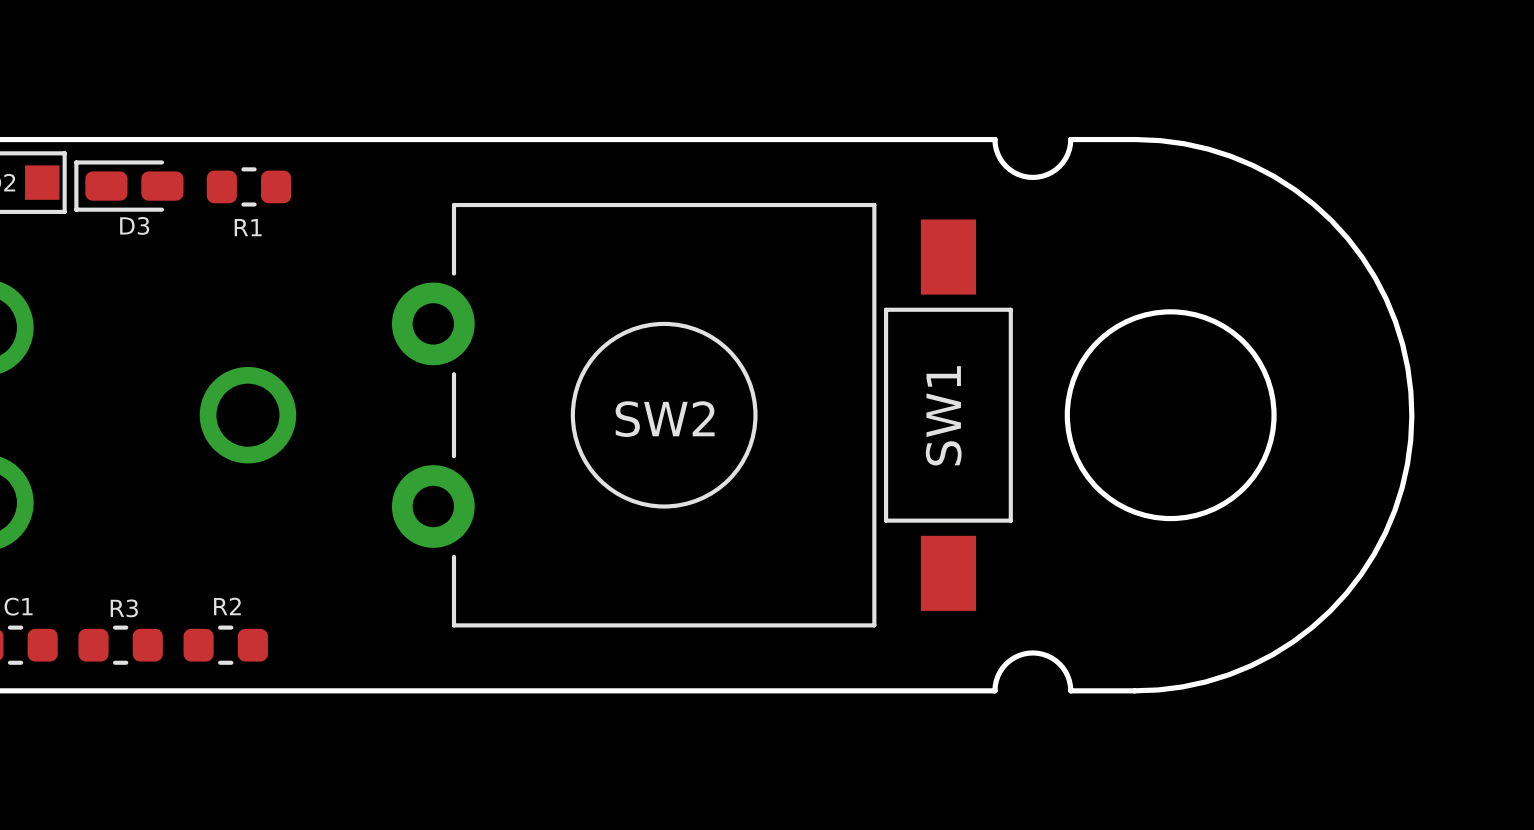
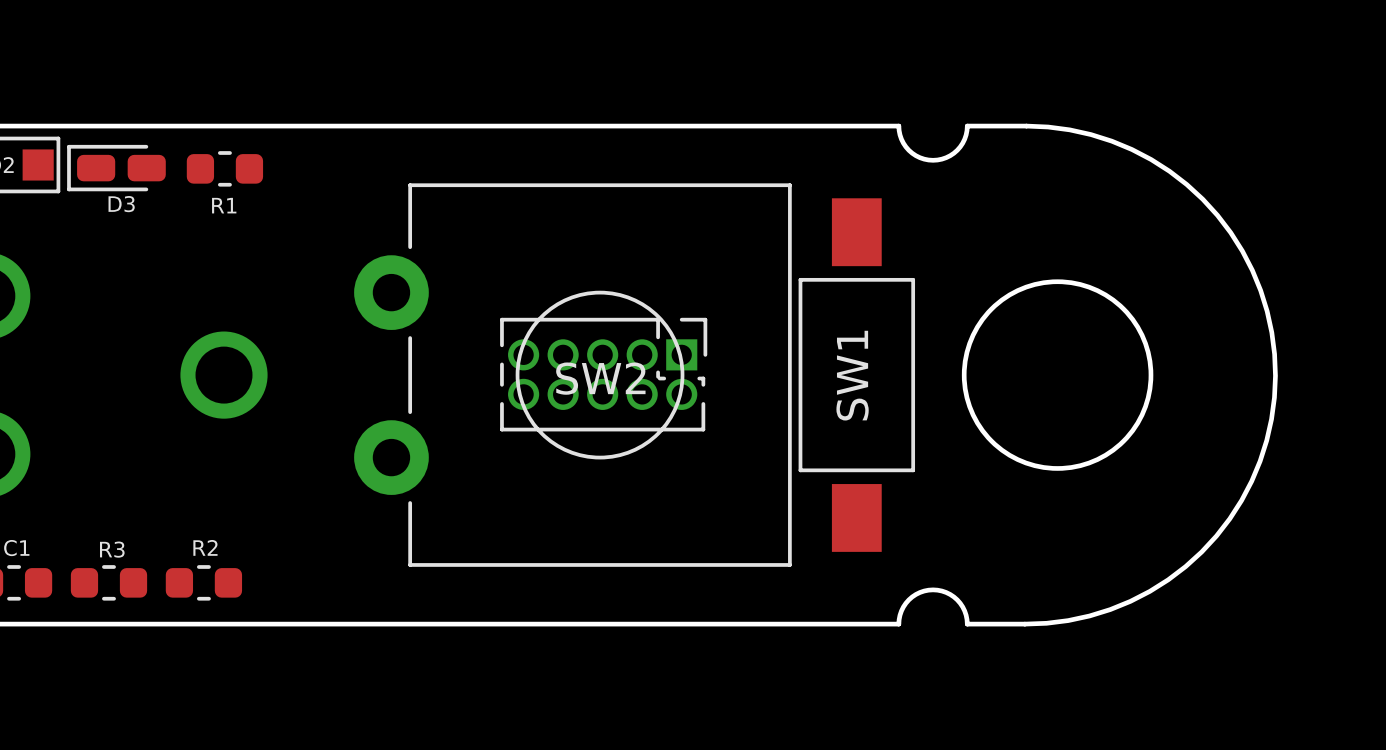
part: none -> (603, 374)

